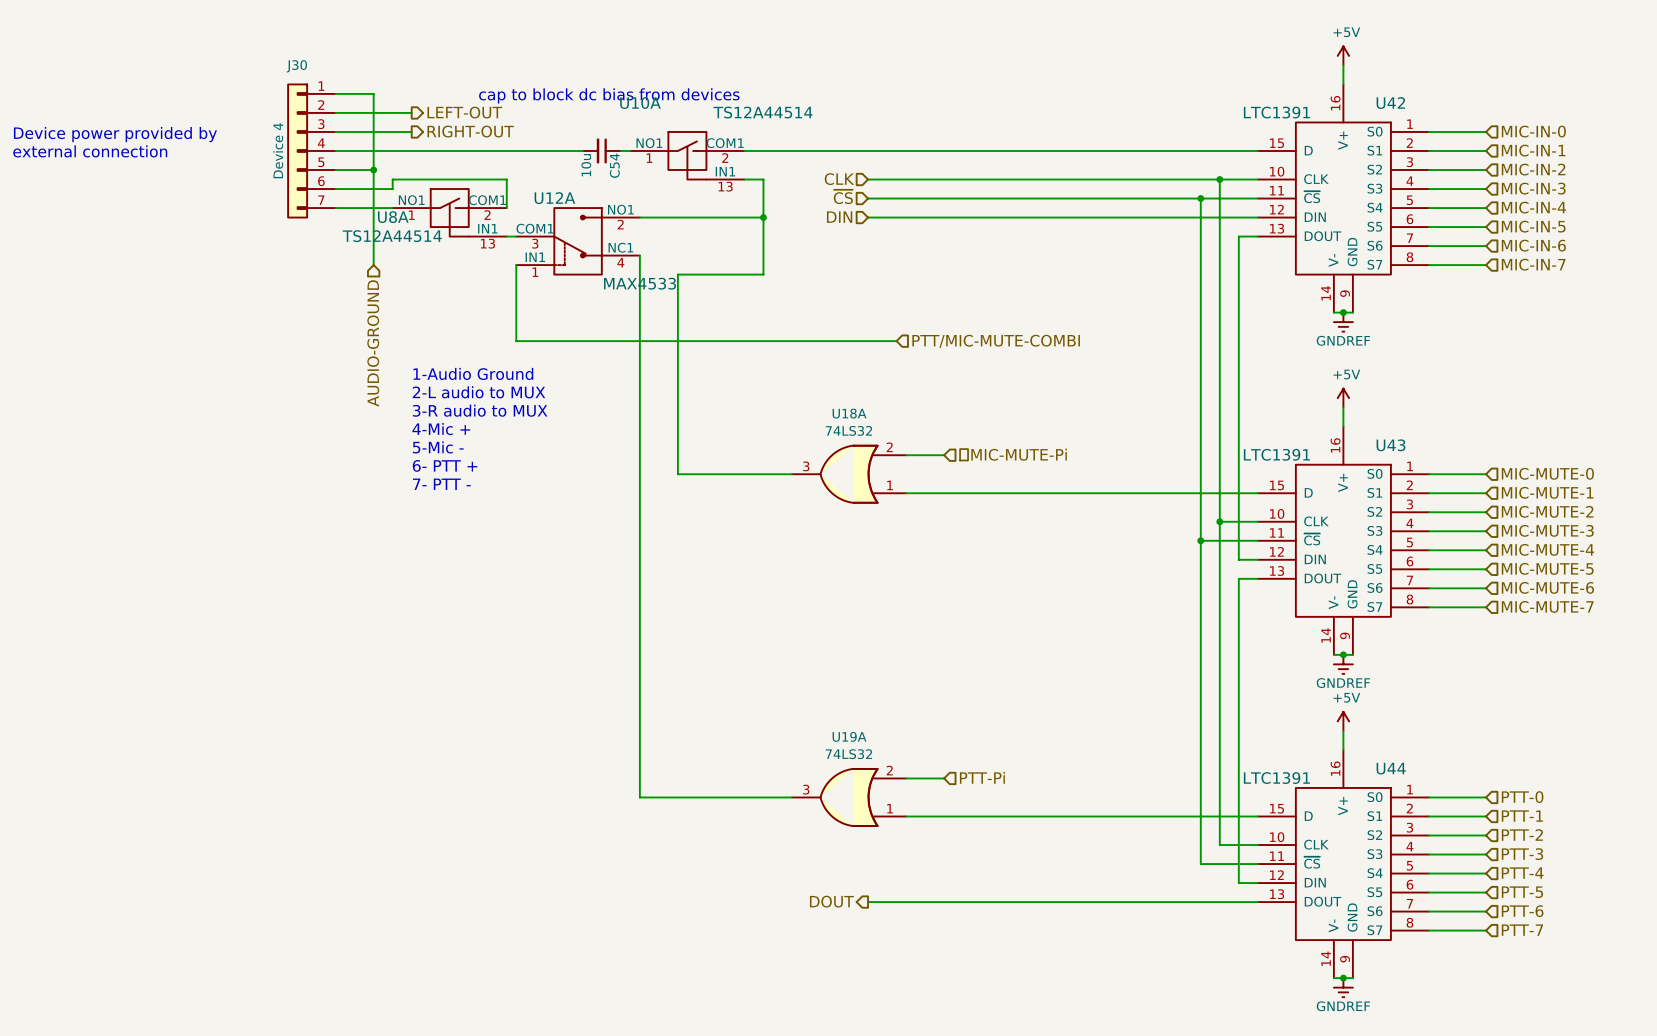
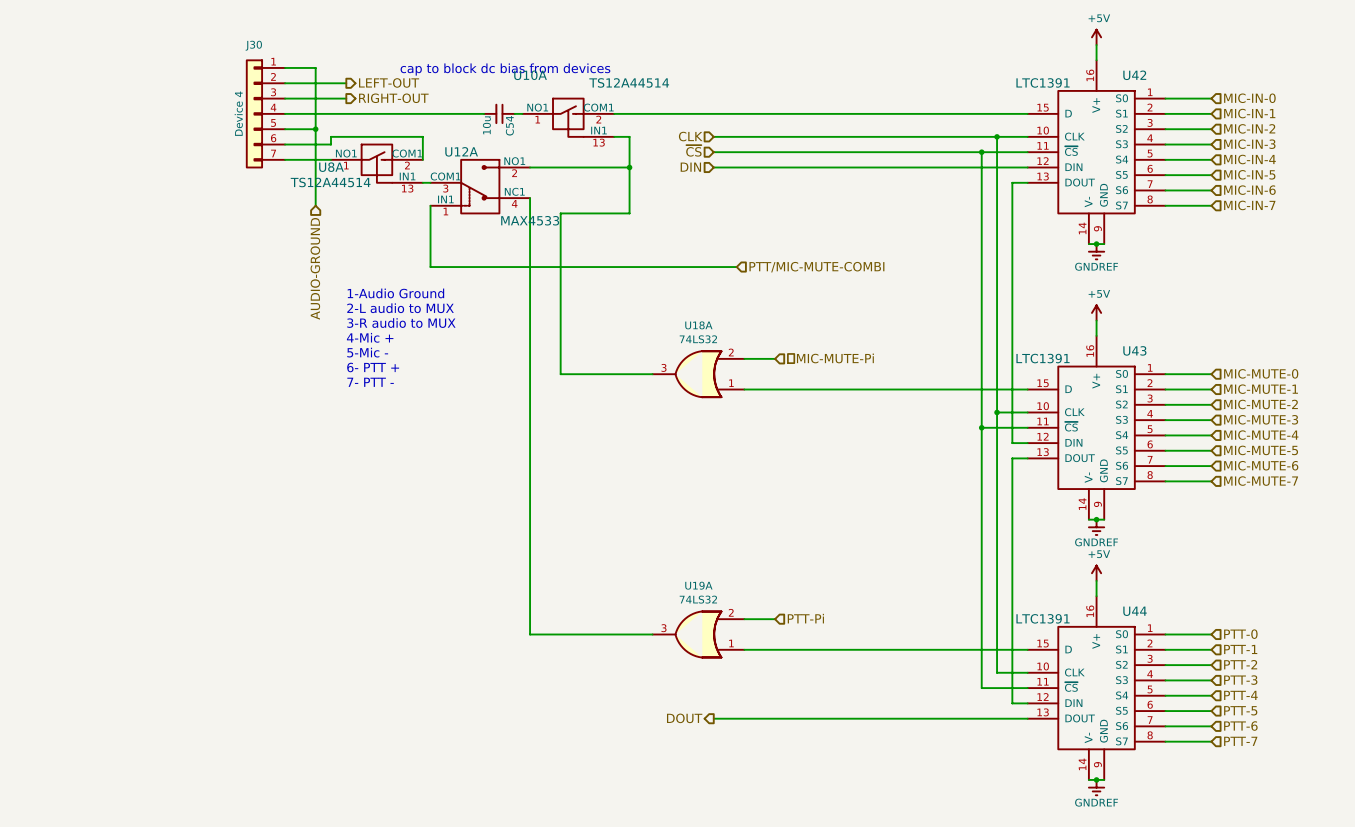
text: Device power provided by (115, 134) -> none
text: external connection (90, 151) -> none

